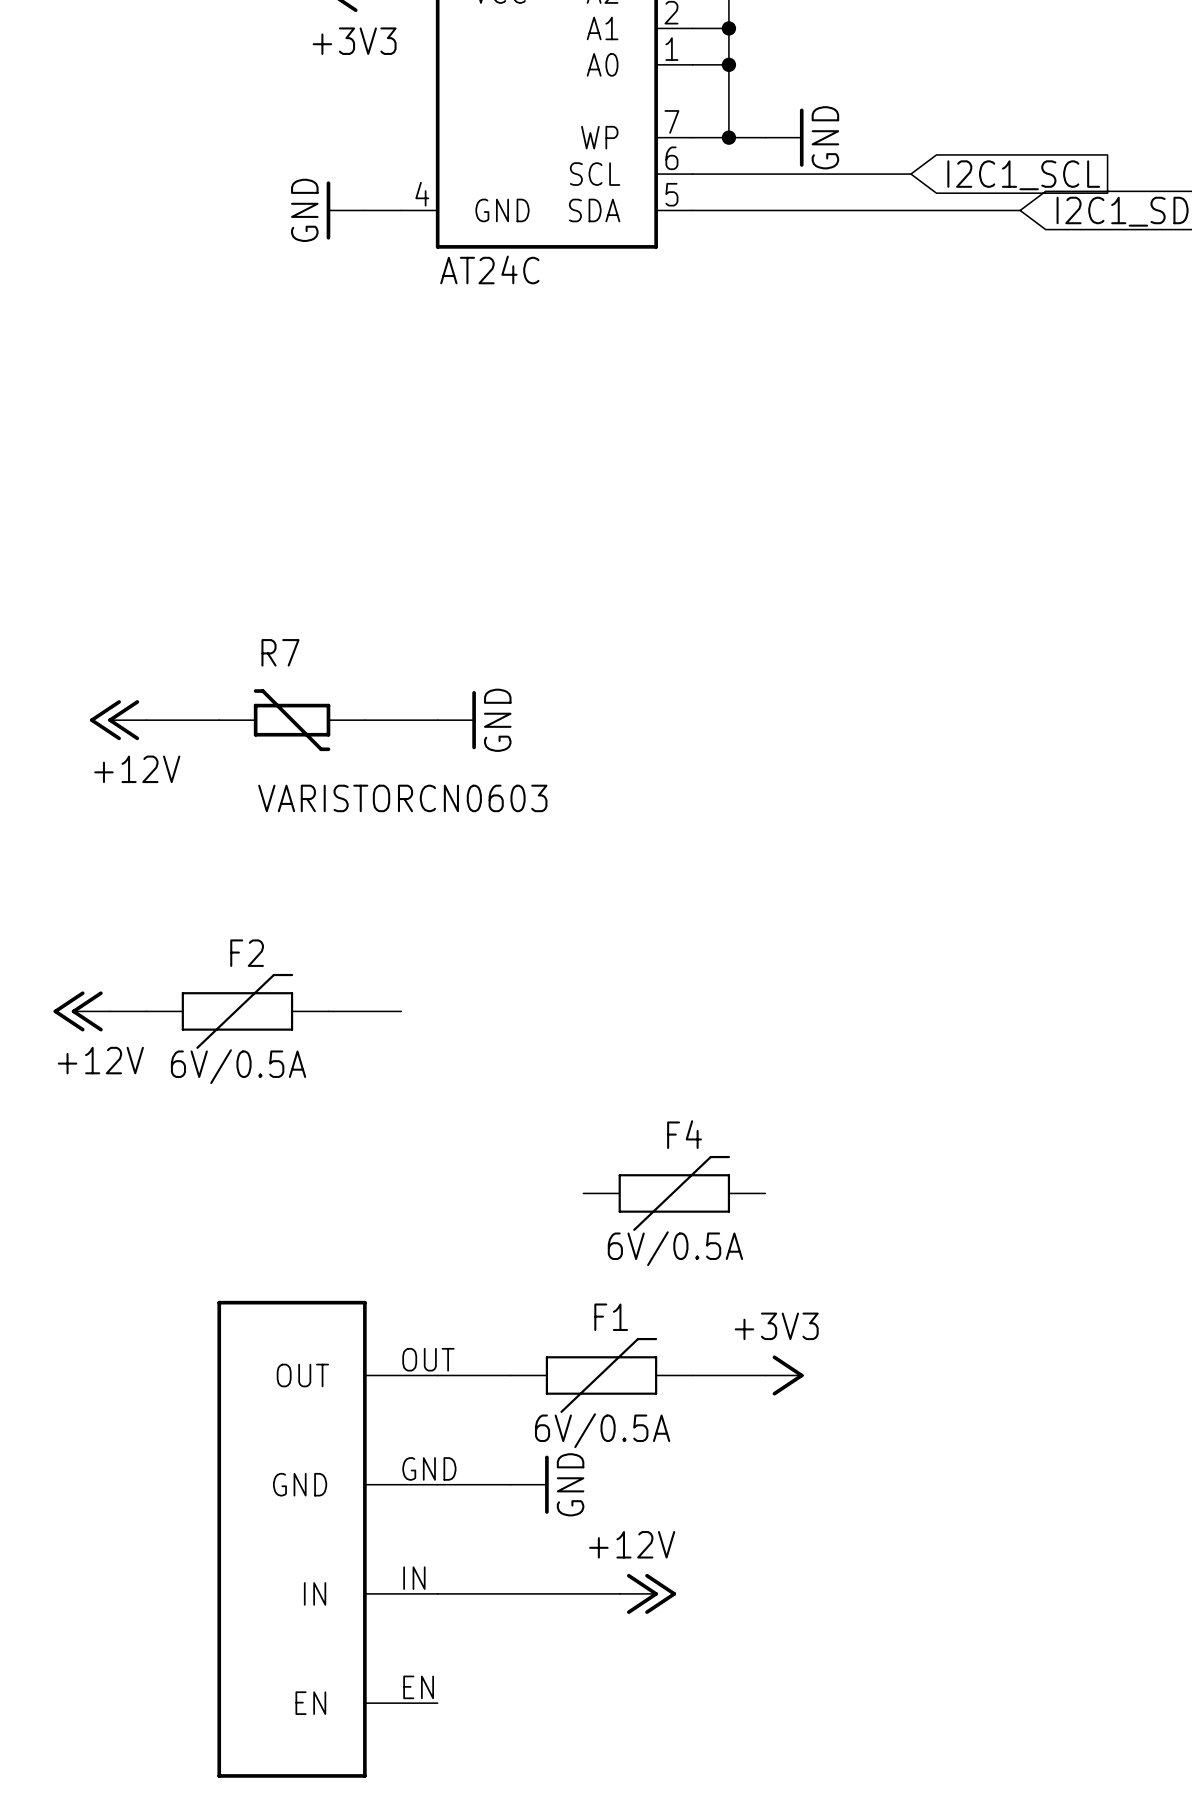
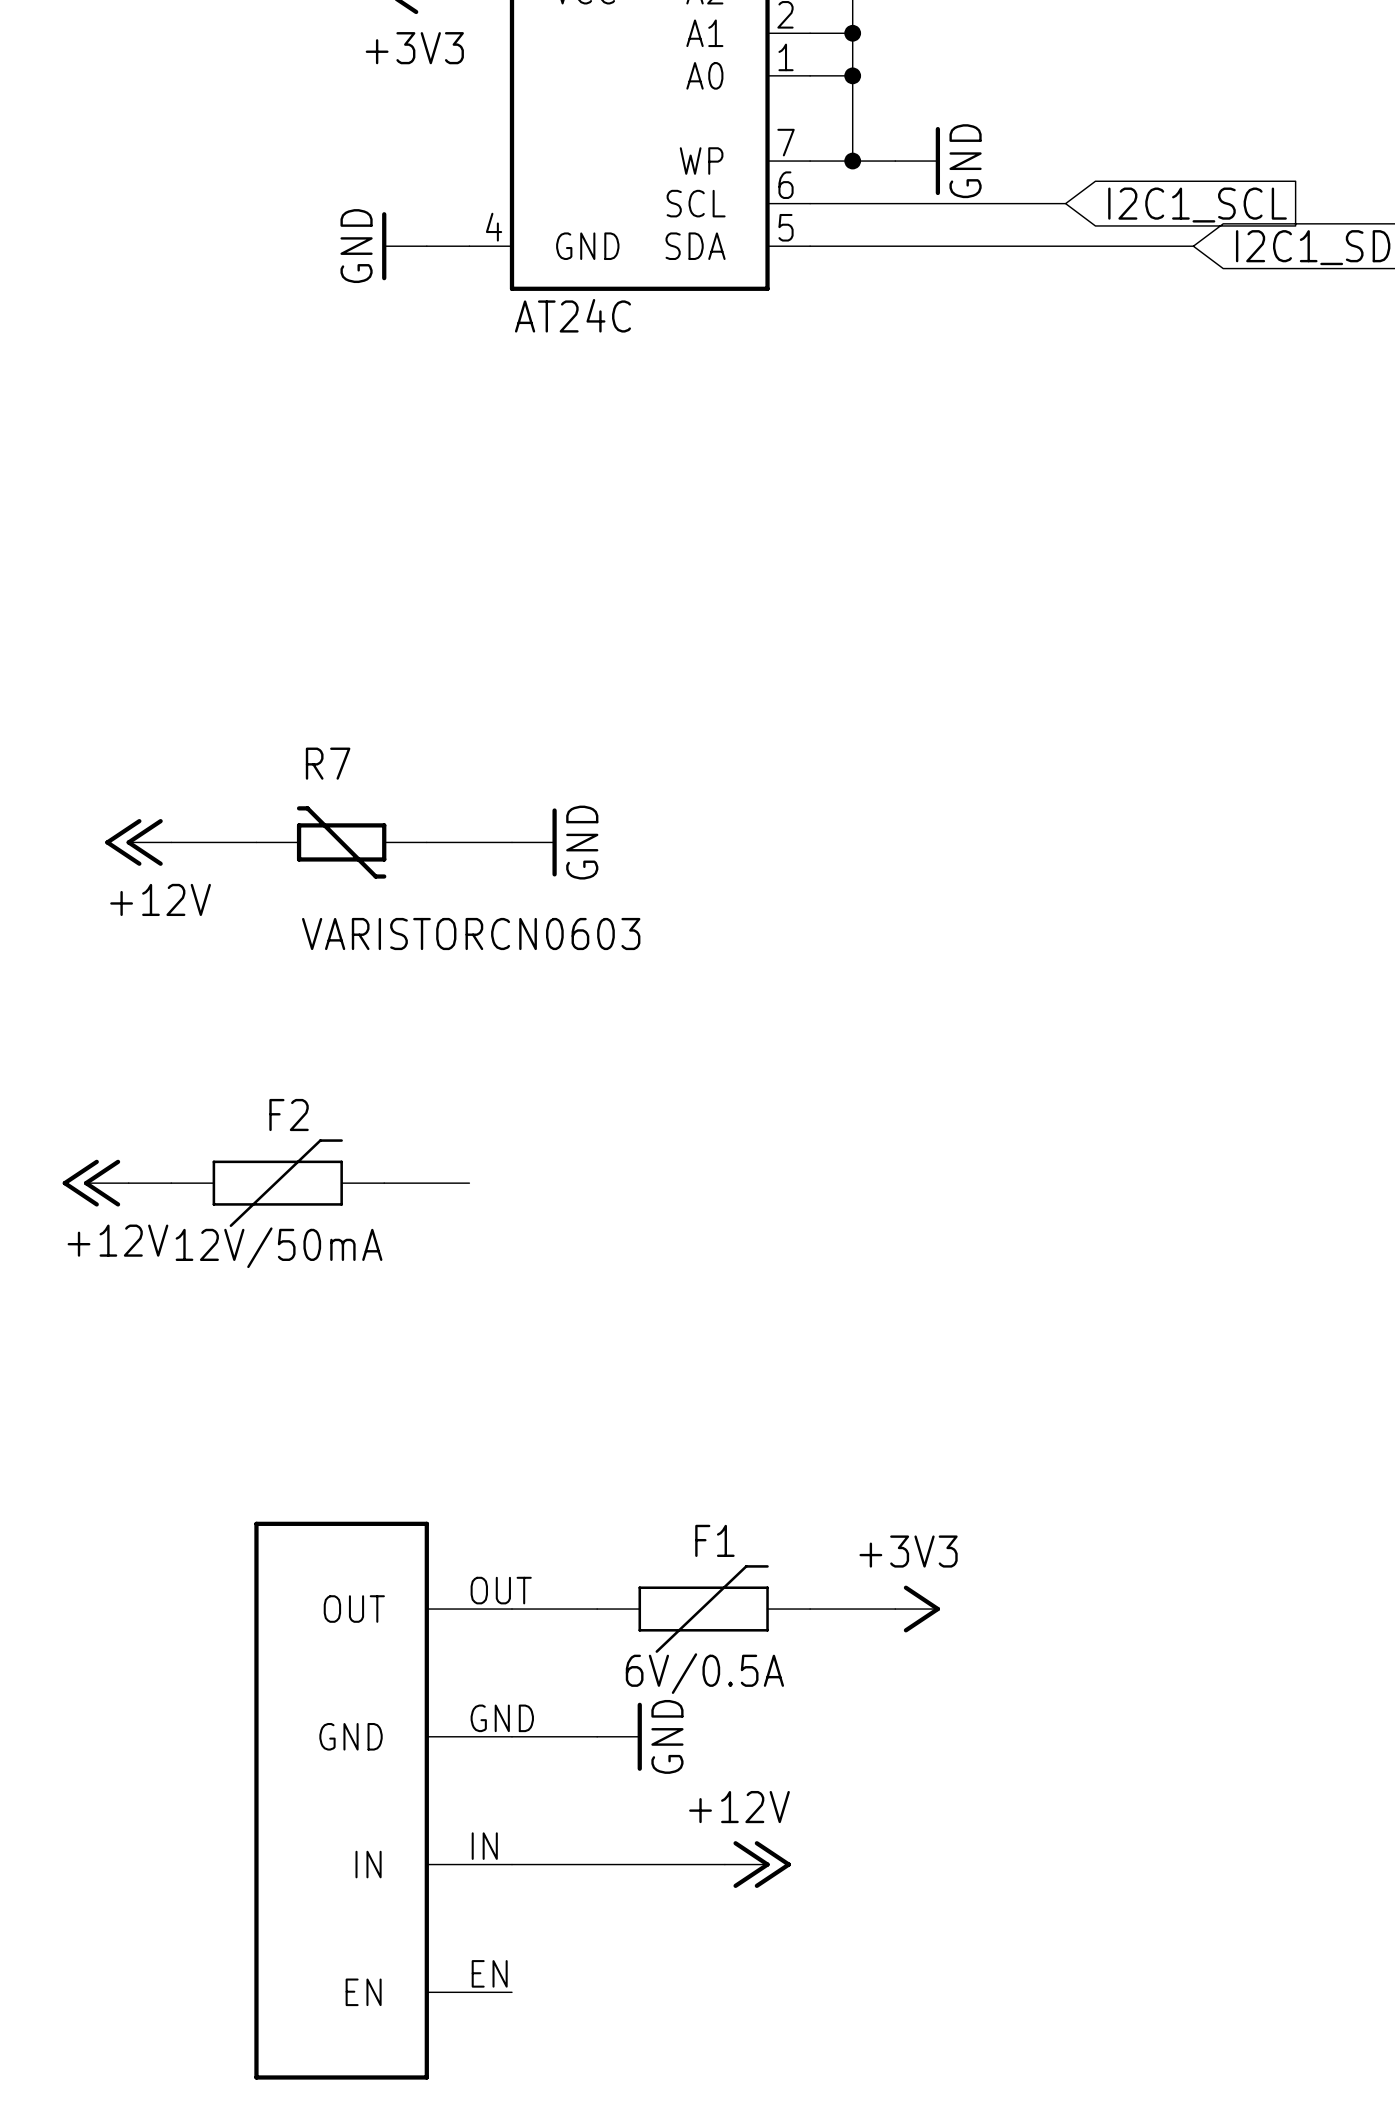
F2 value: 6V/0.5A (238, 1066) -> 12V/50mA (279, 1247)
F4: 6V/0.5A (674, 1193) -> none

